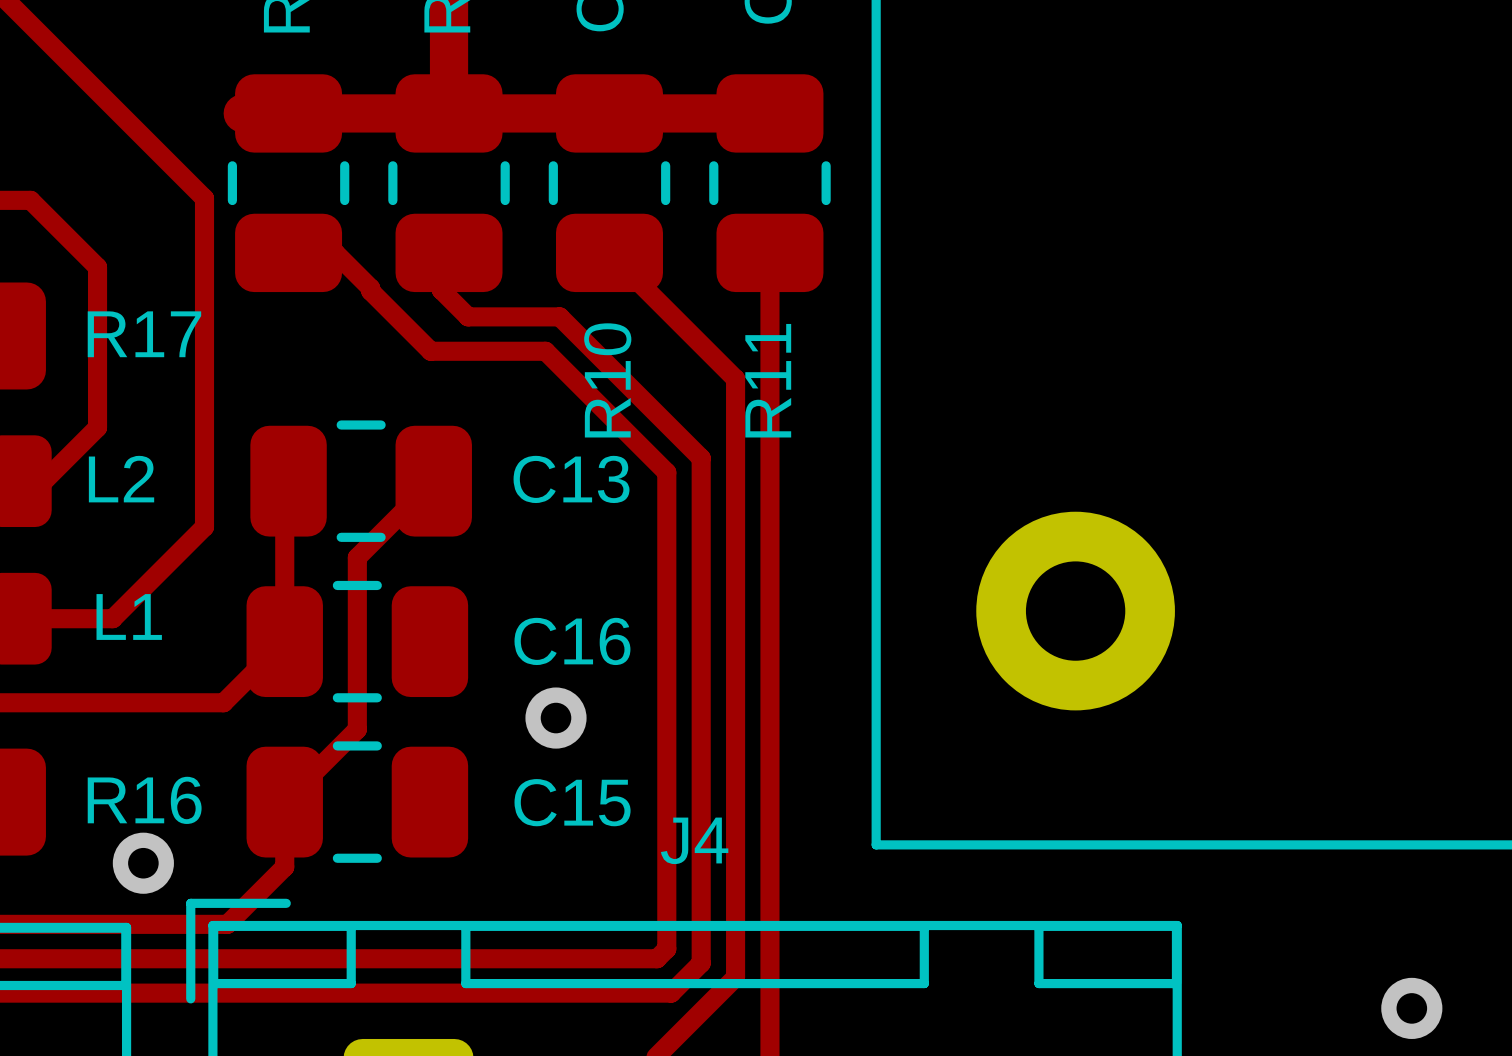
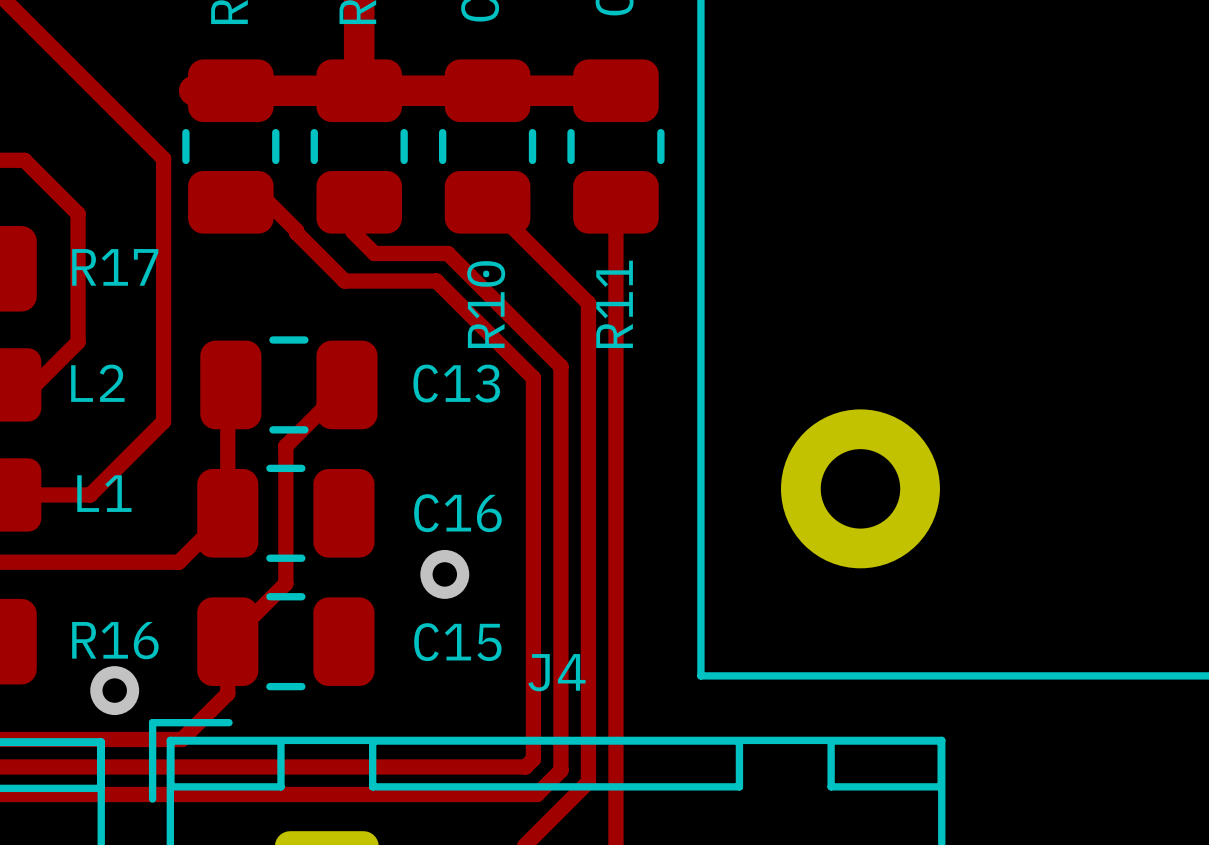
via: (1411, 1008) -> none

